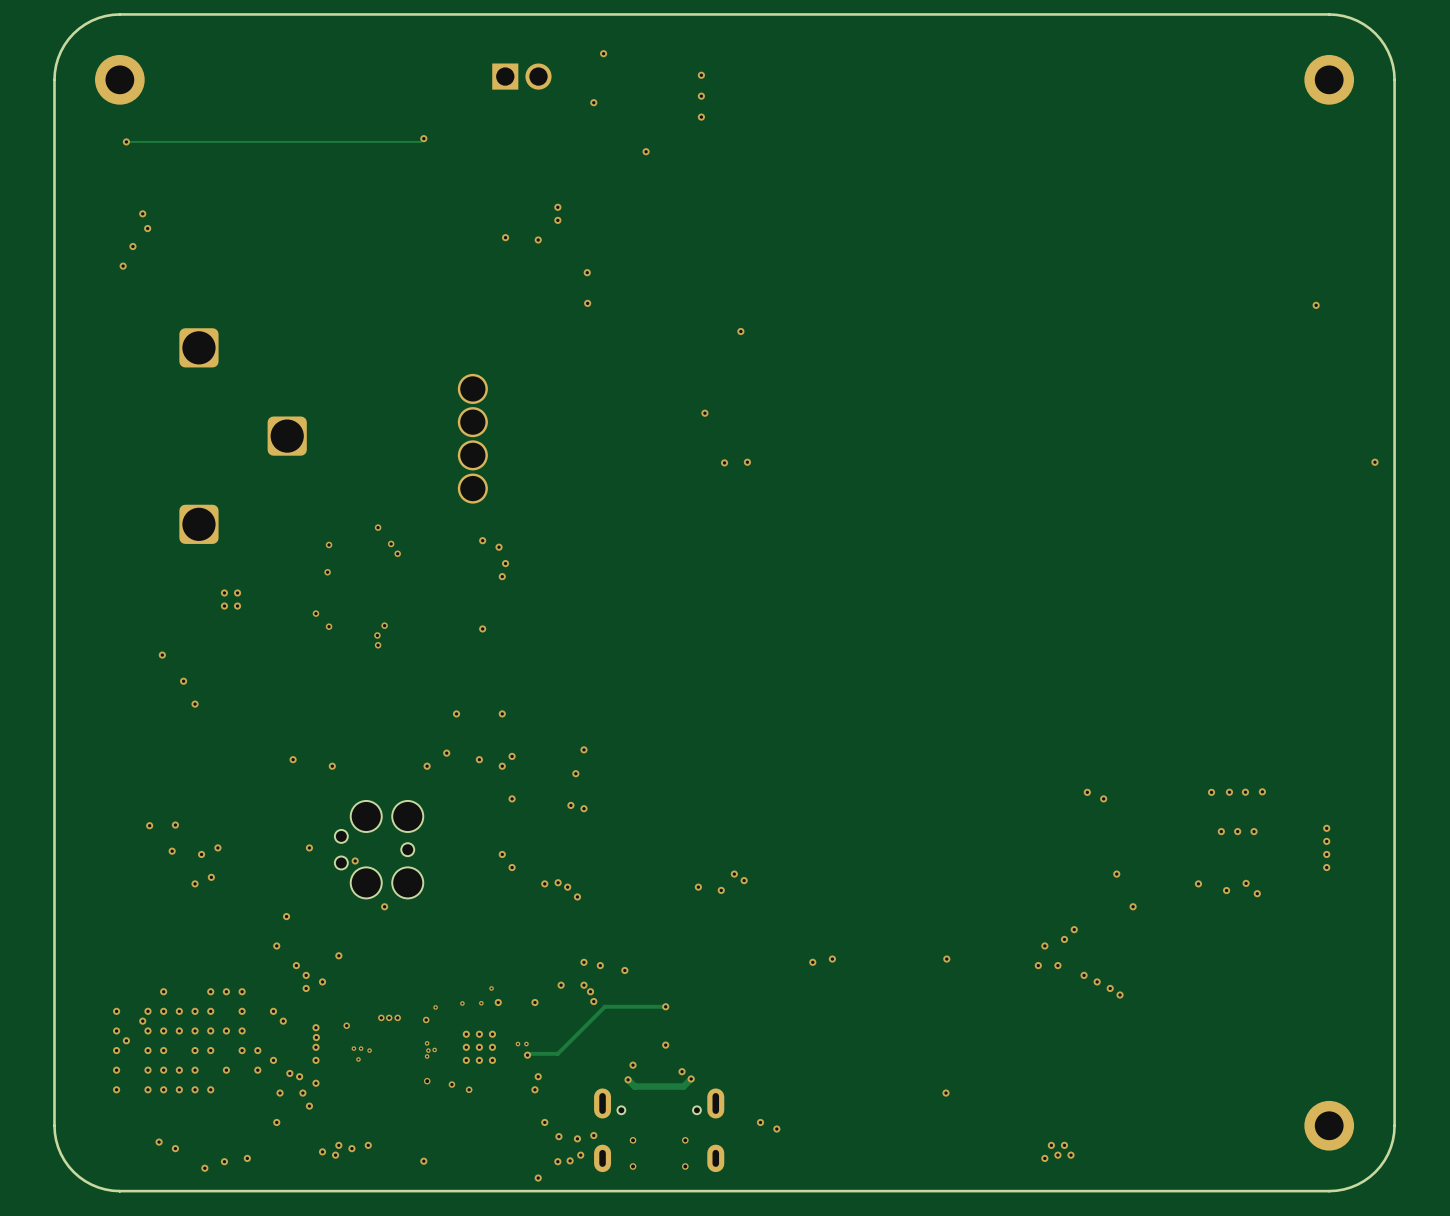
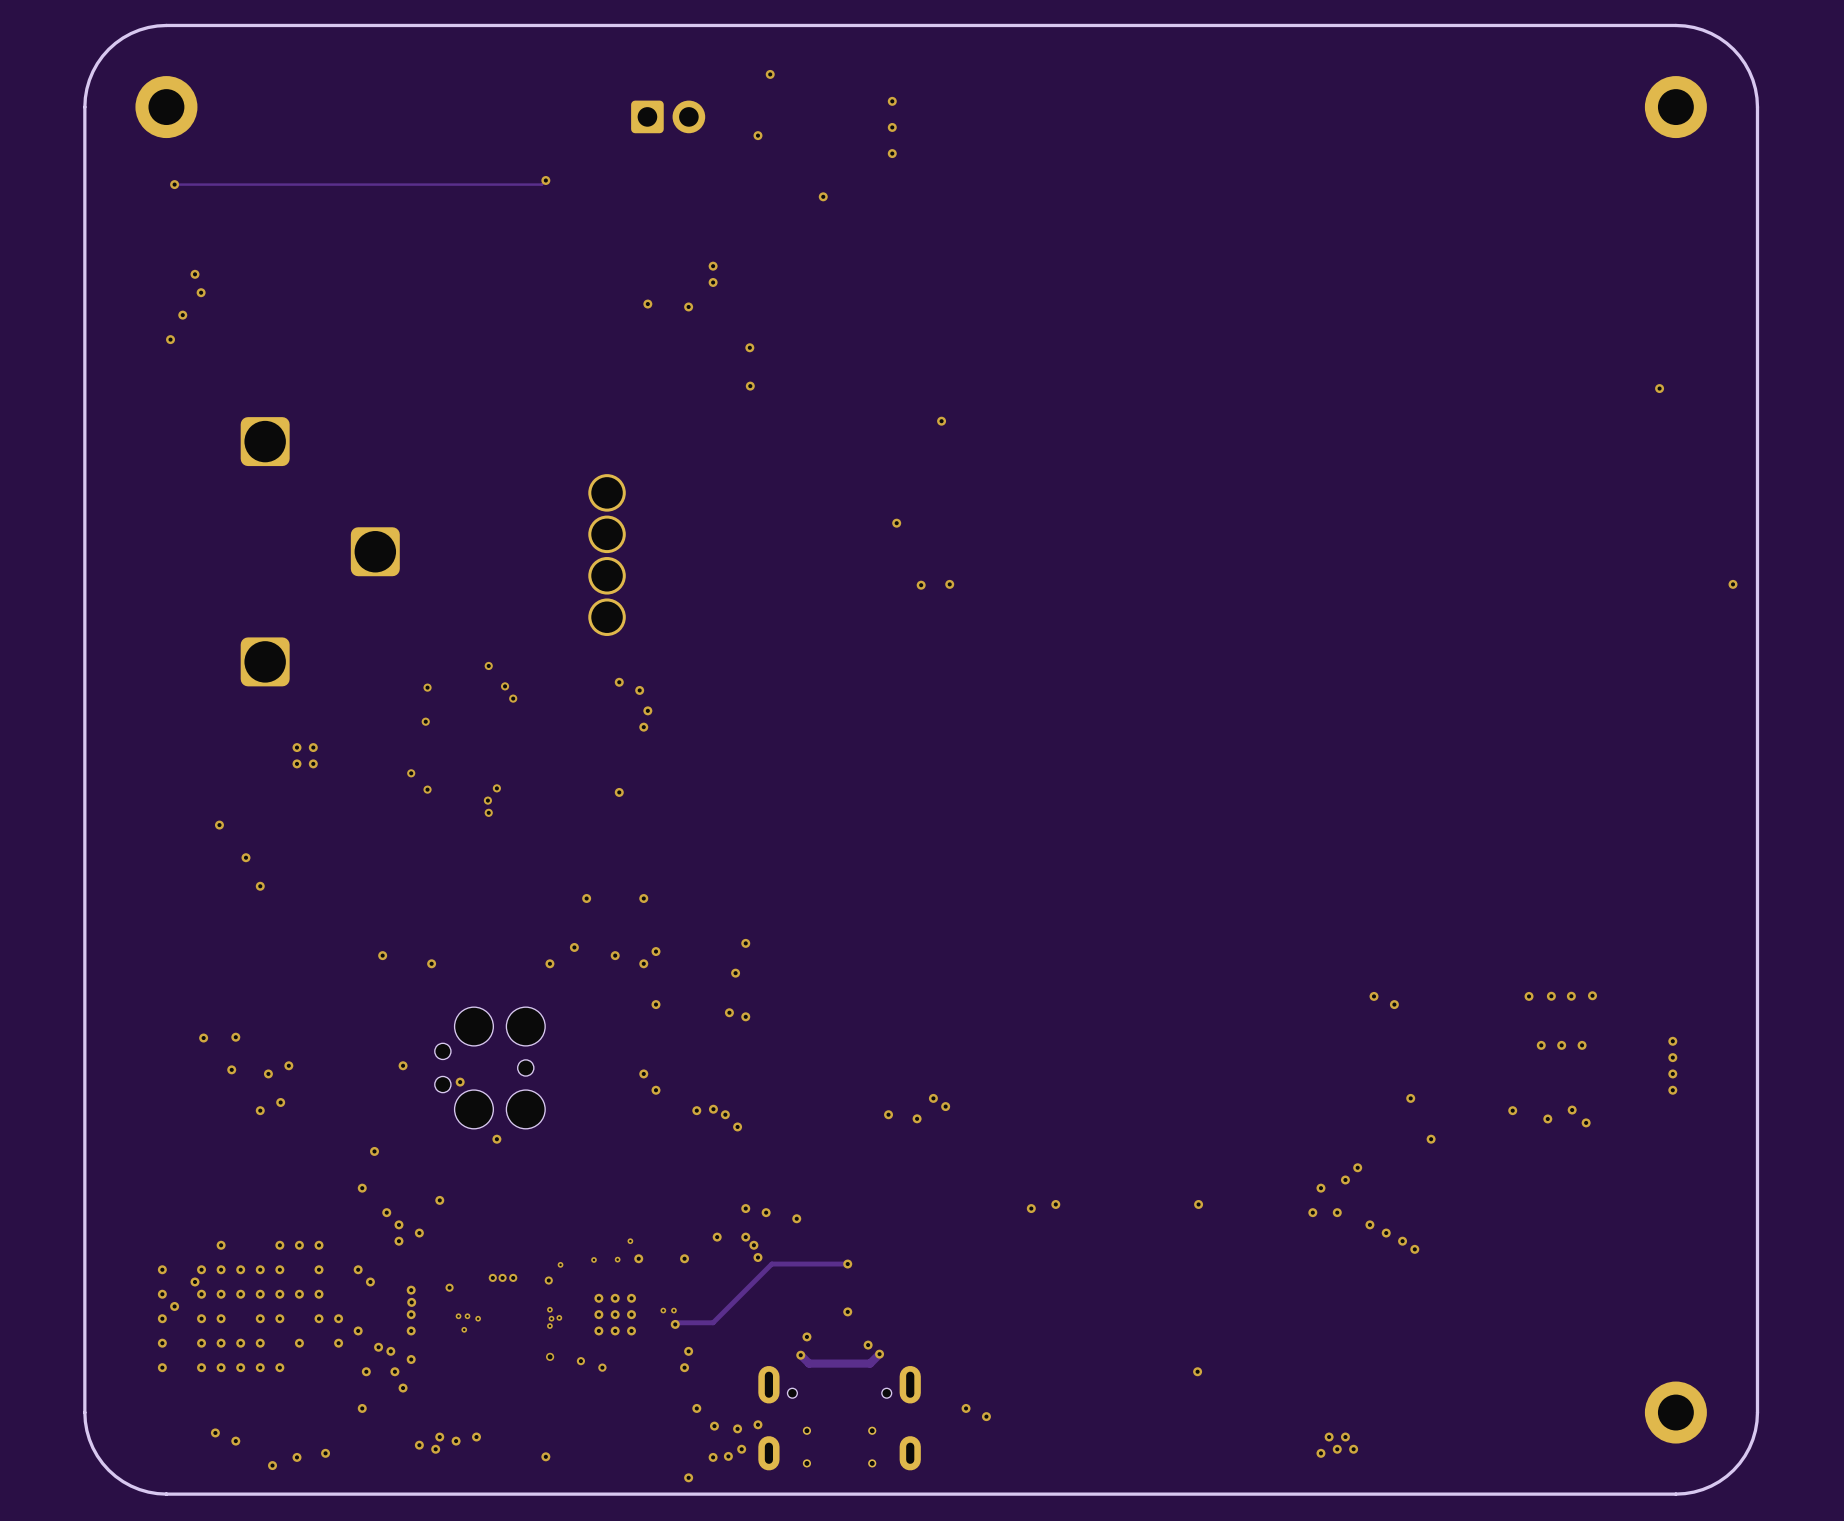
part footprint: [492, 63, 552, 90] -> [631, 100, 706, 134]

